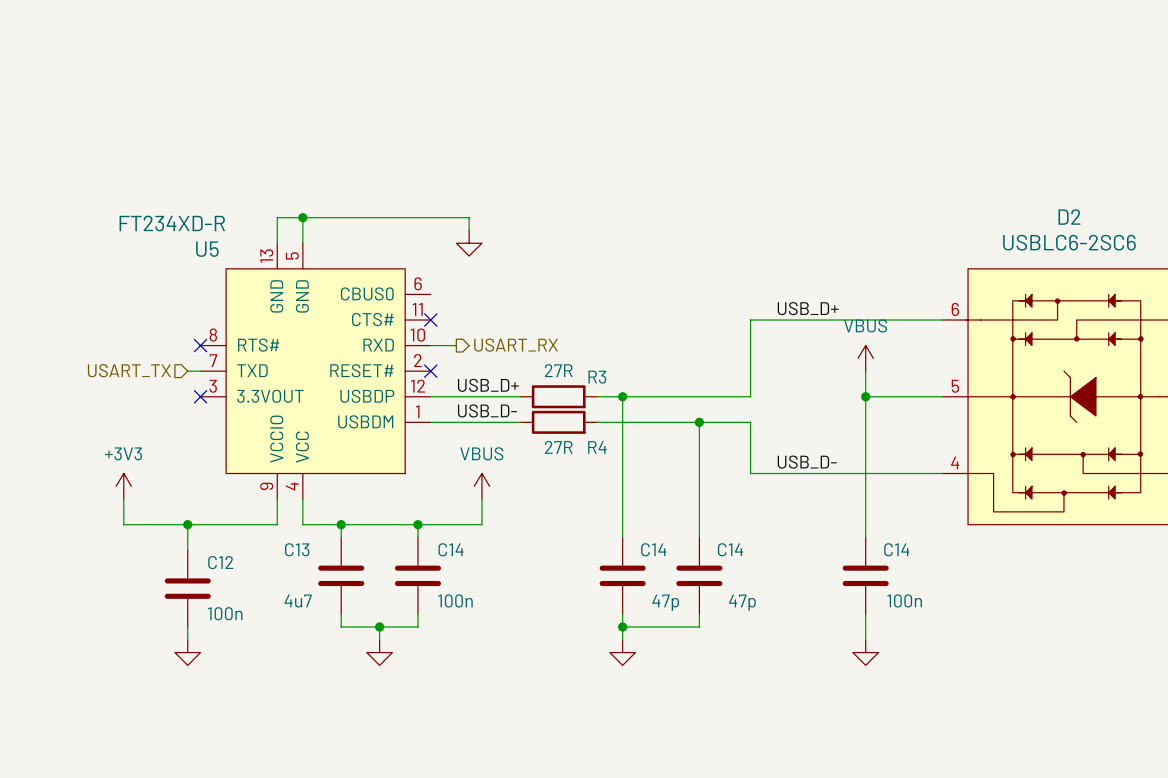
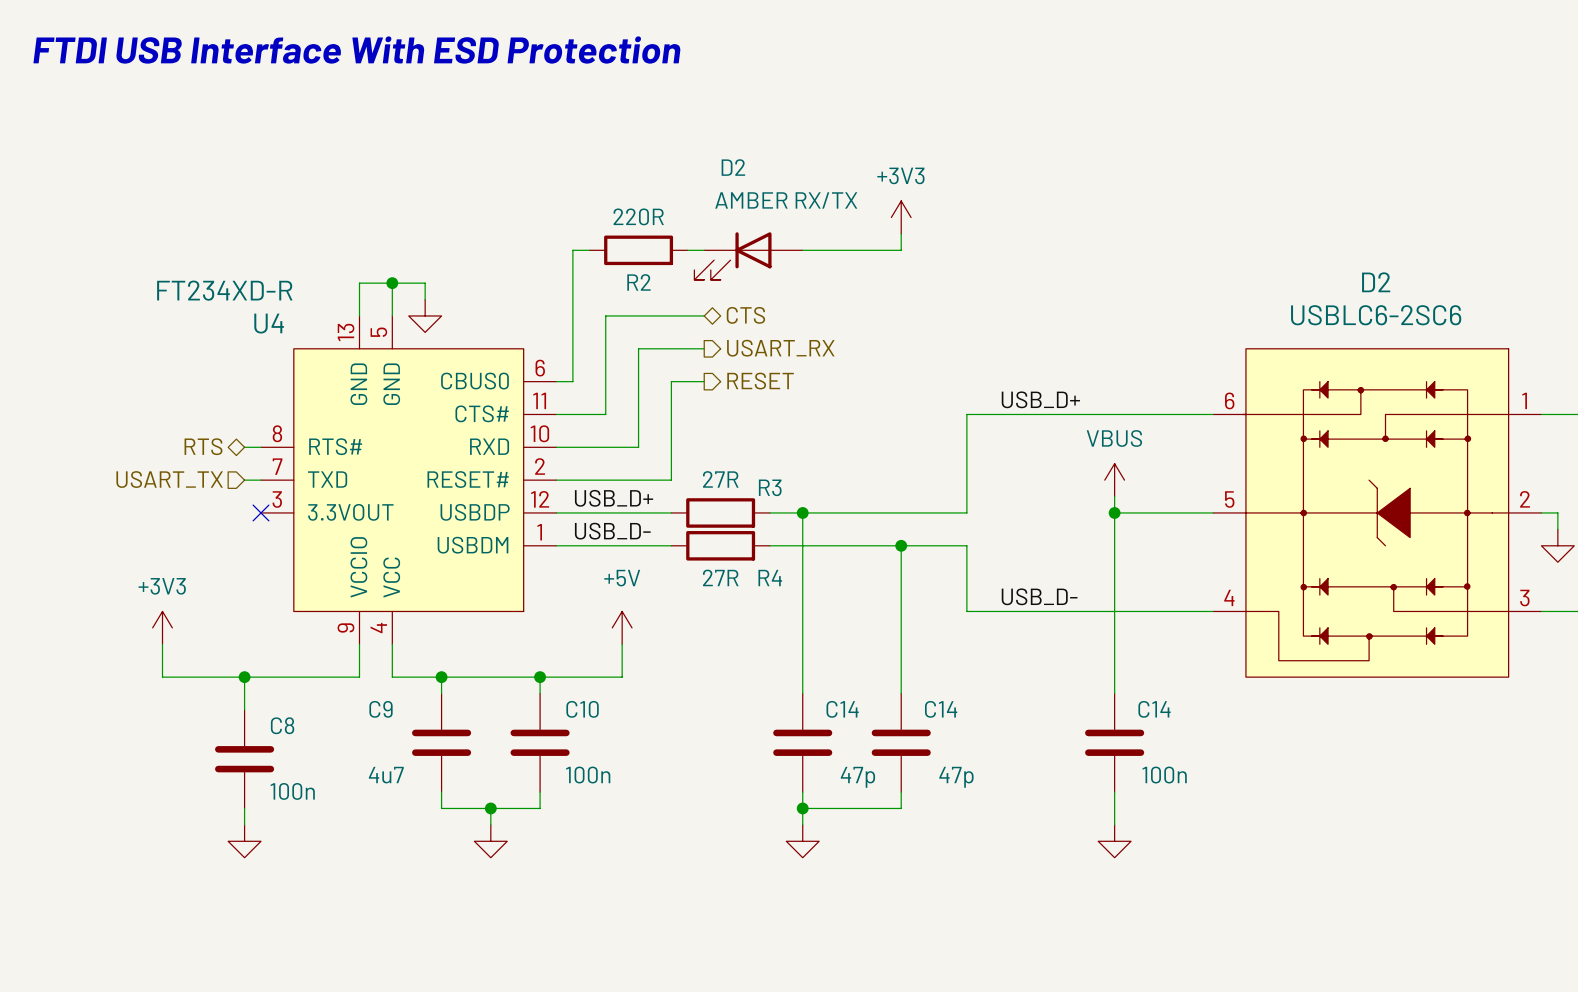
text: none -> FTDI USB Interface With ESD Protection (357, 50)
power symbol: none -> +3V3 (901, 217)
wire: none -> (901, 233) (901, 250) (802, 250)
wire: none -> (589, 250) (572, 250) (572, 381) (556, 381)
R2: none -> 220R (638, 250)
wire: none -> (687, 250) (704, 250)
D2: none -> AMBER RX/TX (748, 256)
wire: (328, 217) (469, 217) (469, 230) -> (425, 283) (425, 299)
hierarchical label: none -> CTS (745, 315)
power symbol position: (469, 243) -> (425, 315)
wire: none -> (704, 315) (605, 315) (605, 414) (556, 414)
U5 name: U5 (207, 249) -> U4 (269, 323)
wire: none -> (704, 348) (638, 348) (638, 447) (589, 447)
hierarchical label: none -> RESET (760, 381)
wire: none -> (704, 381) (671, 381) (671, 480) (556, 480)
no-connect mark: (430, 320) -> none
hierarchical label: none -> RTS (203, 446)
wire: none -> (244, 447) (261, 447)
no-connect mark: (200, 345) -> none
hierarchical label position: USART_RX (516, 345) -> USART_RX (780, 348)
power symbol position: VBUS (865, 358) -> VBUS (1114, 480)
no-connect mark: (430, 371) -> none
label position: USB_D+ (488, 385) -> USB_D+ (614, 498)
label position: USB_D- (487, 410) -> USB_D- (612, 531)
power symbol: VBUS (481, 486) -> +5V (622, 627)
C13 name: C13 (297, 549) -> C9 (381, 709)
C14 name: C14 (451, 549) -> C10 (582, 709)
C12 name: C12 (220, 562) -> C8 (282, 725)

